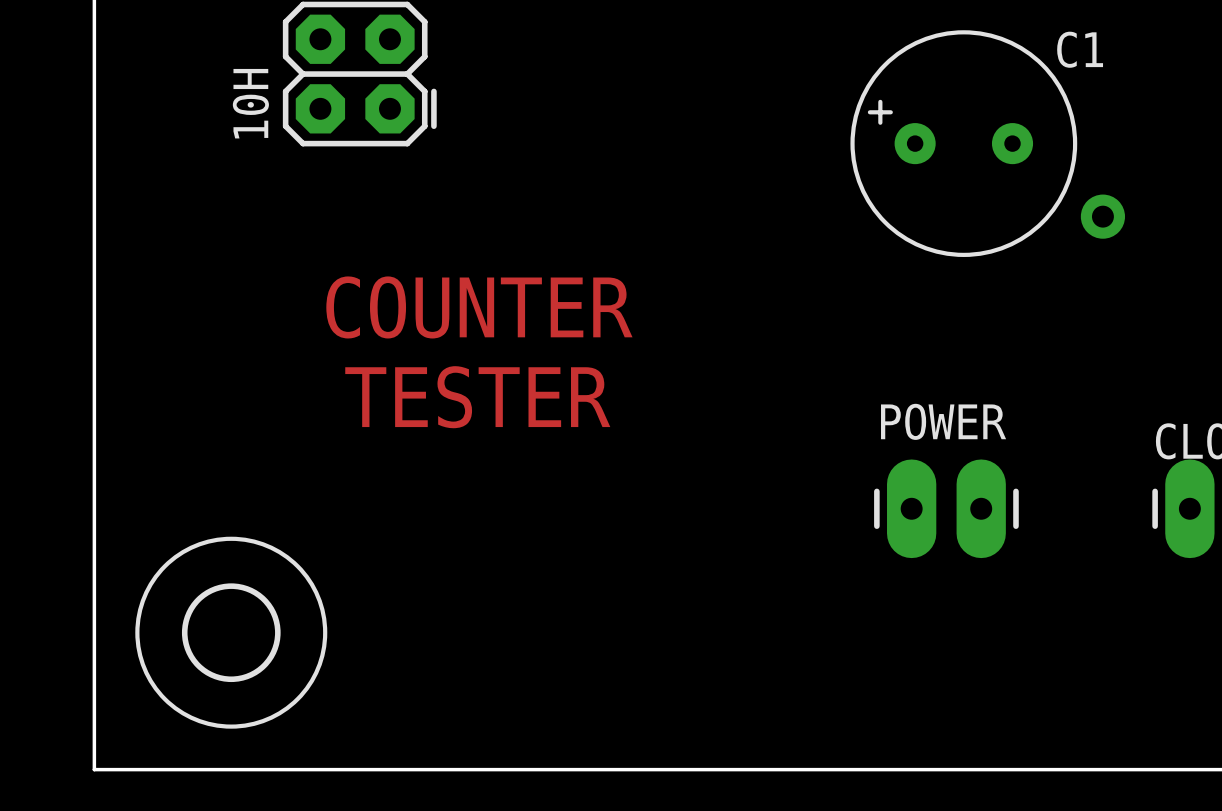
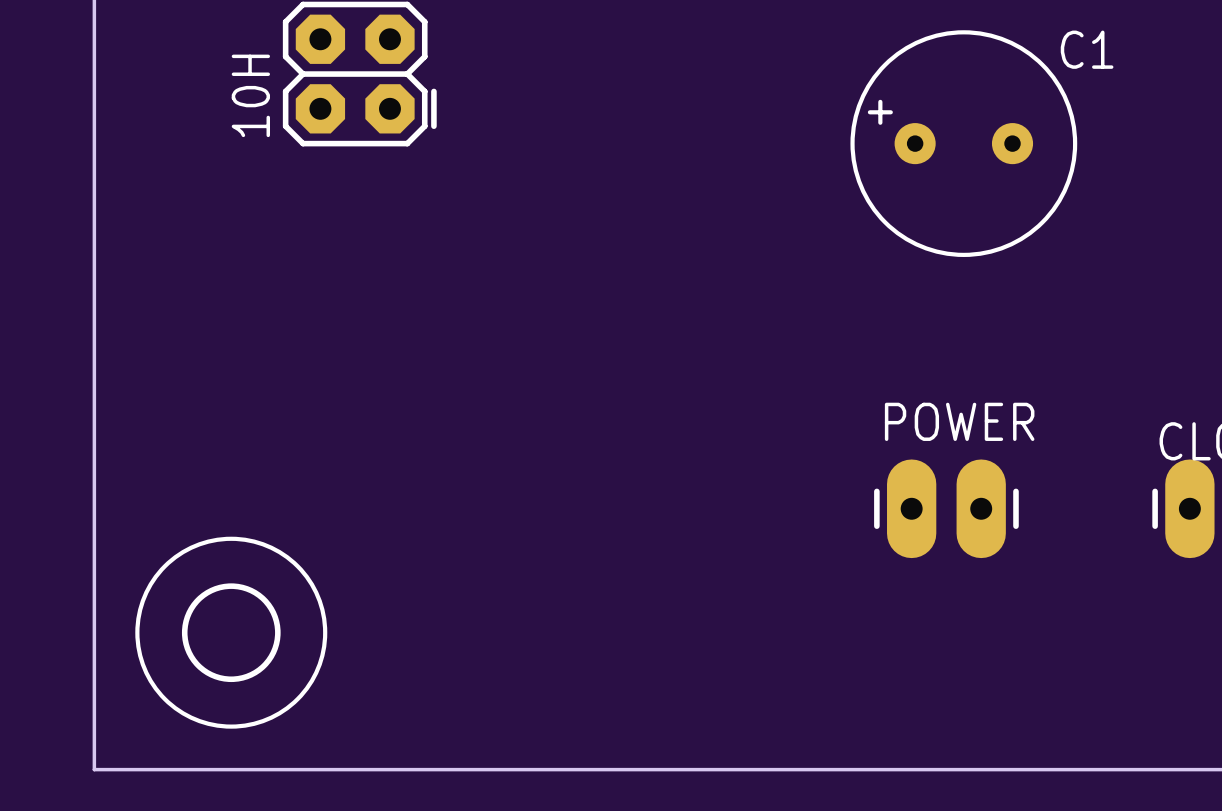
via: (1102, 216) -> none
text: COUNTER (479, 307) -> none
text: TESTER (477, 397) -> none

